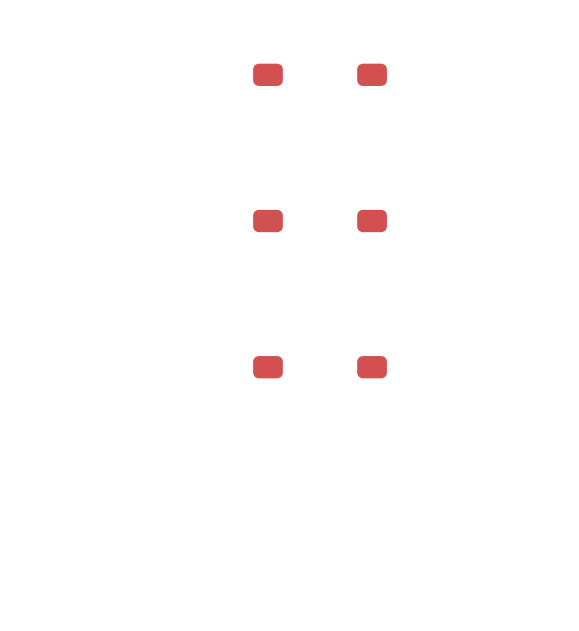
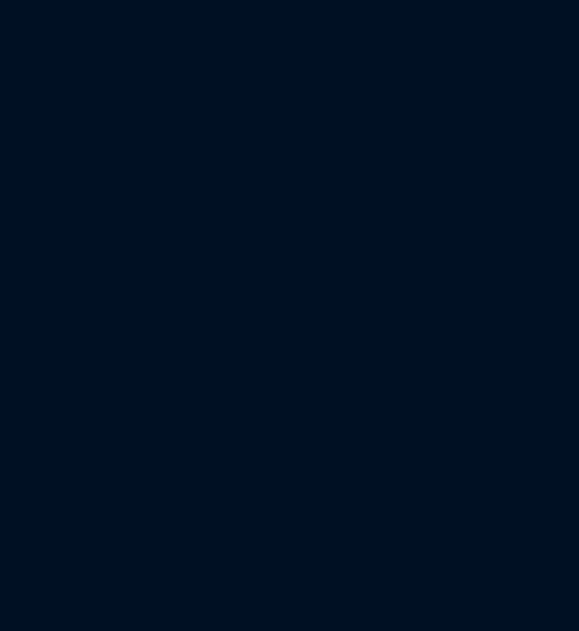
part: (320, 74) -> none
part: (320, 221) -> none
part: (320, 367) -> none

